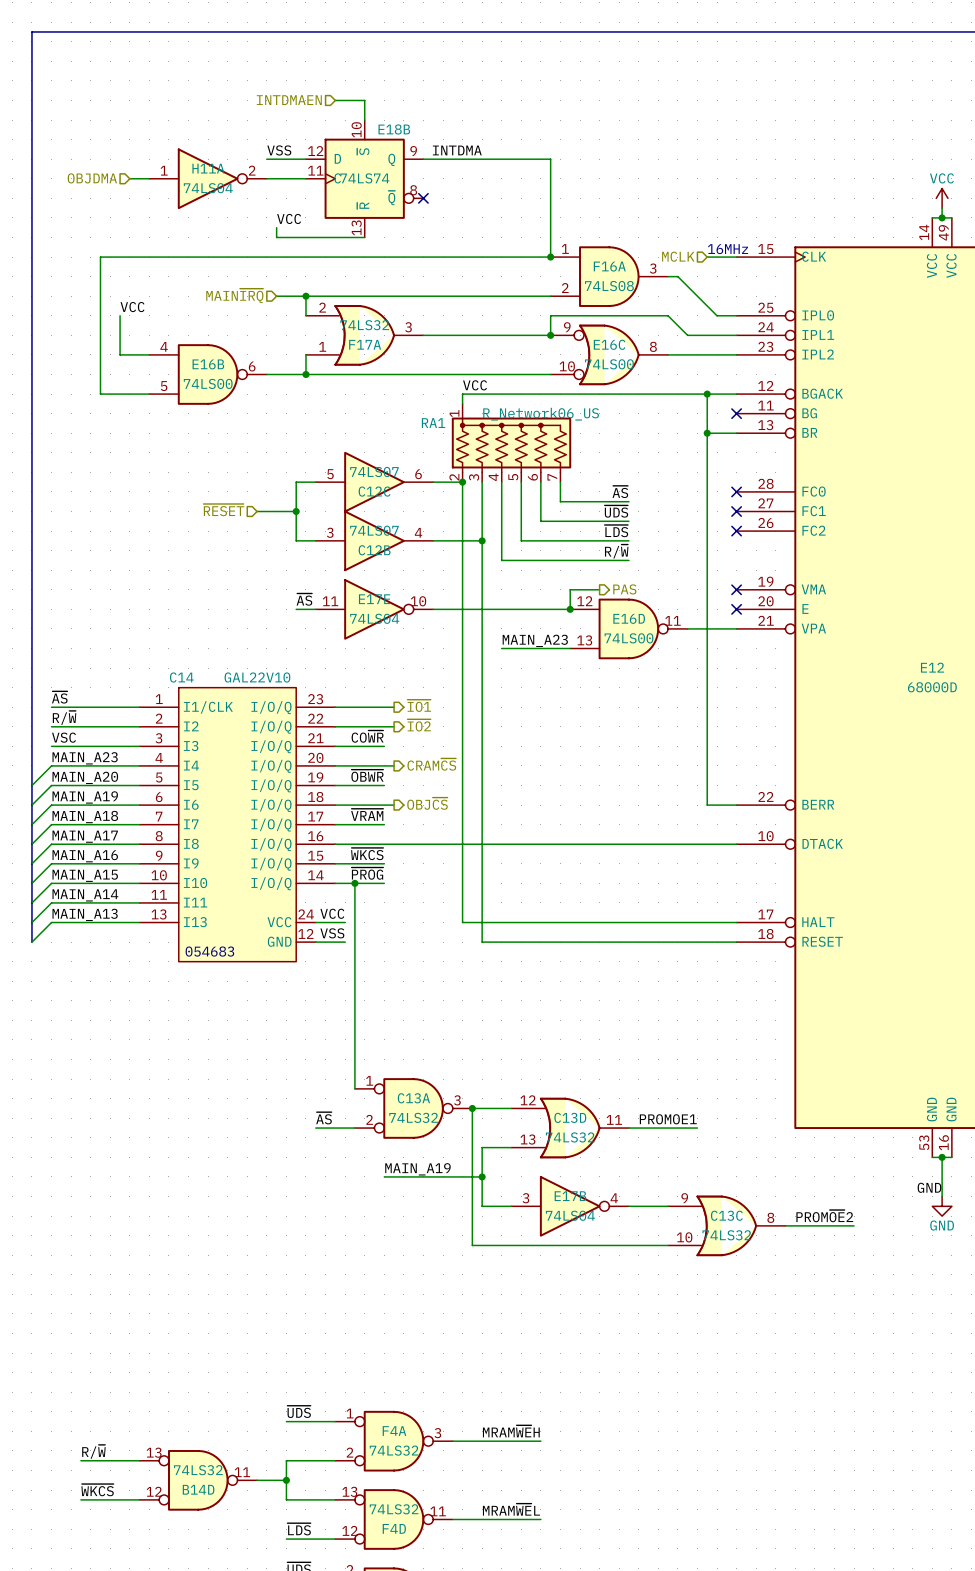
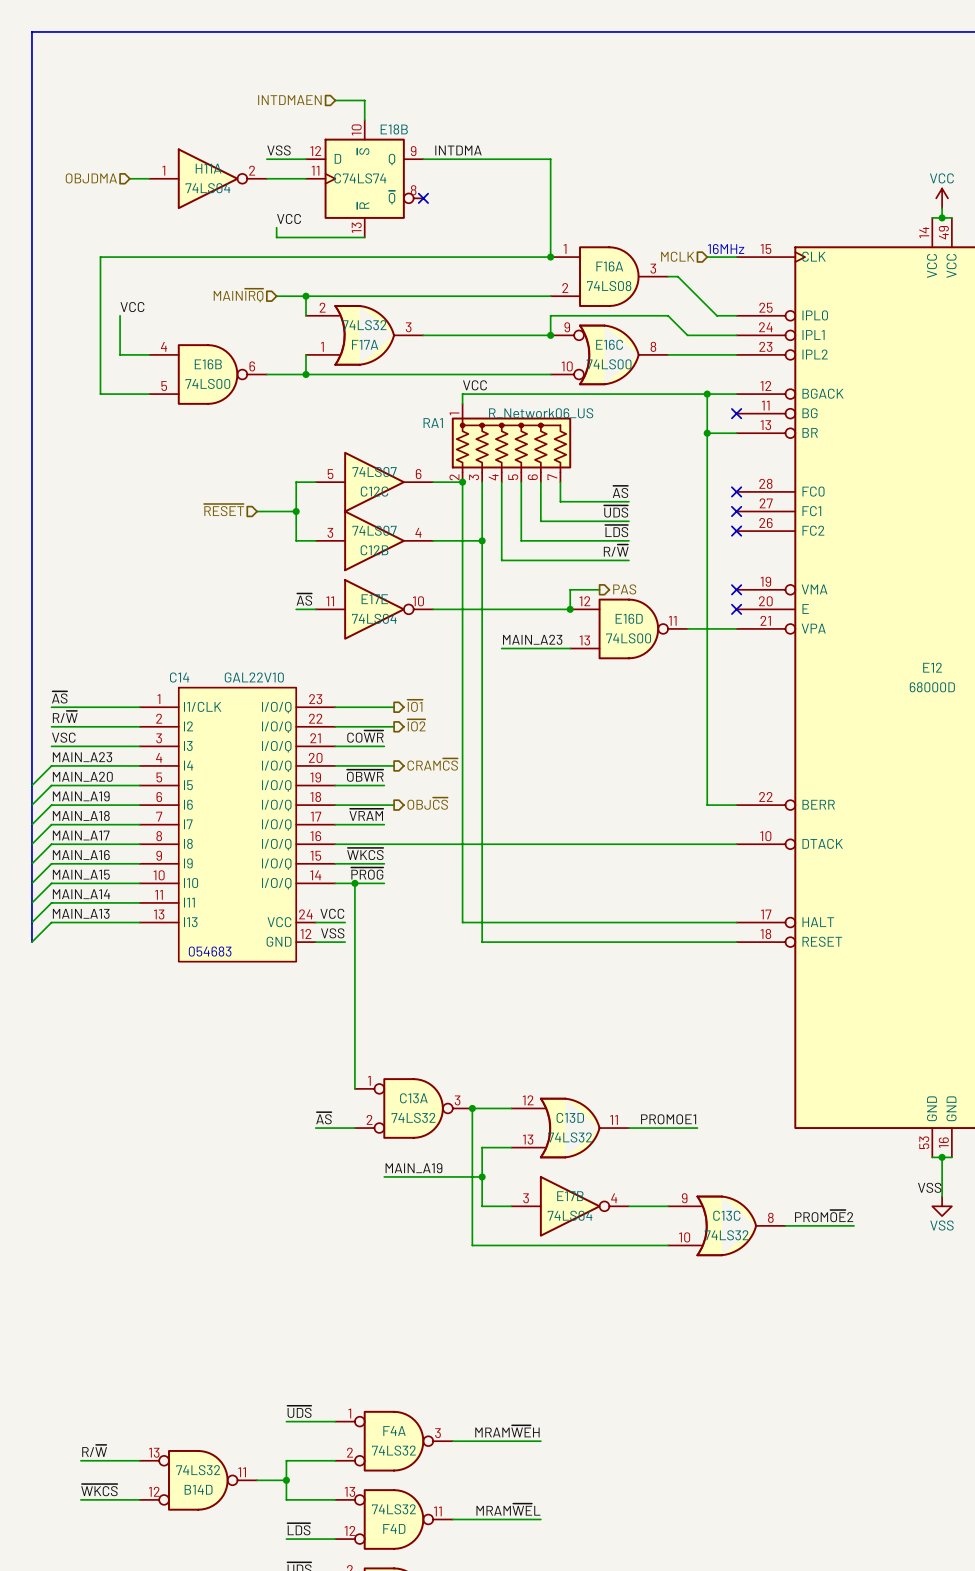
label: GND (929, 1187) -> VSS (929, 1187)
power symbol: GND (942, 1206) -> VSS (942, 1206)

